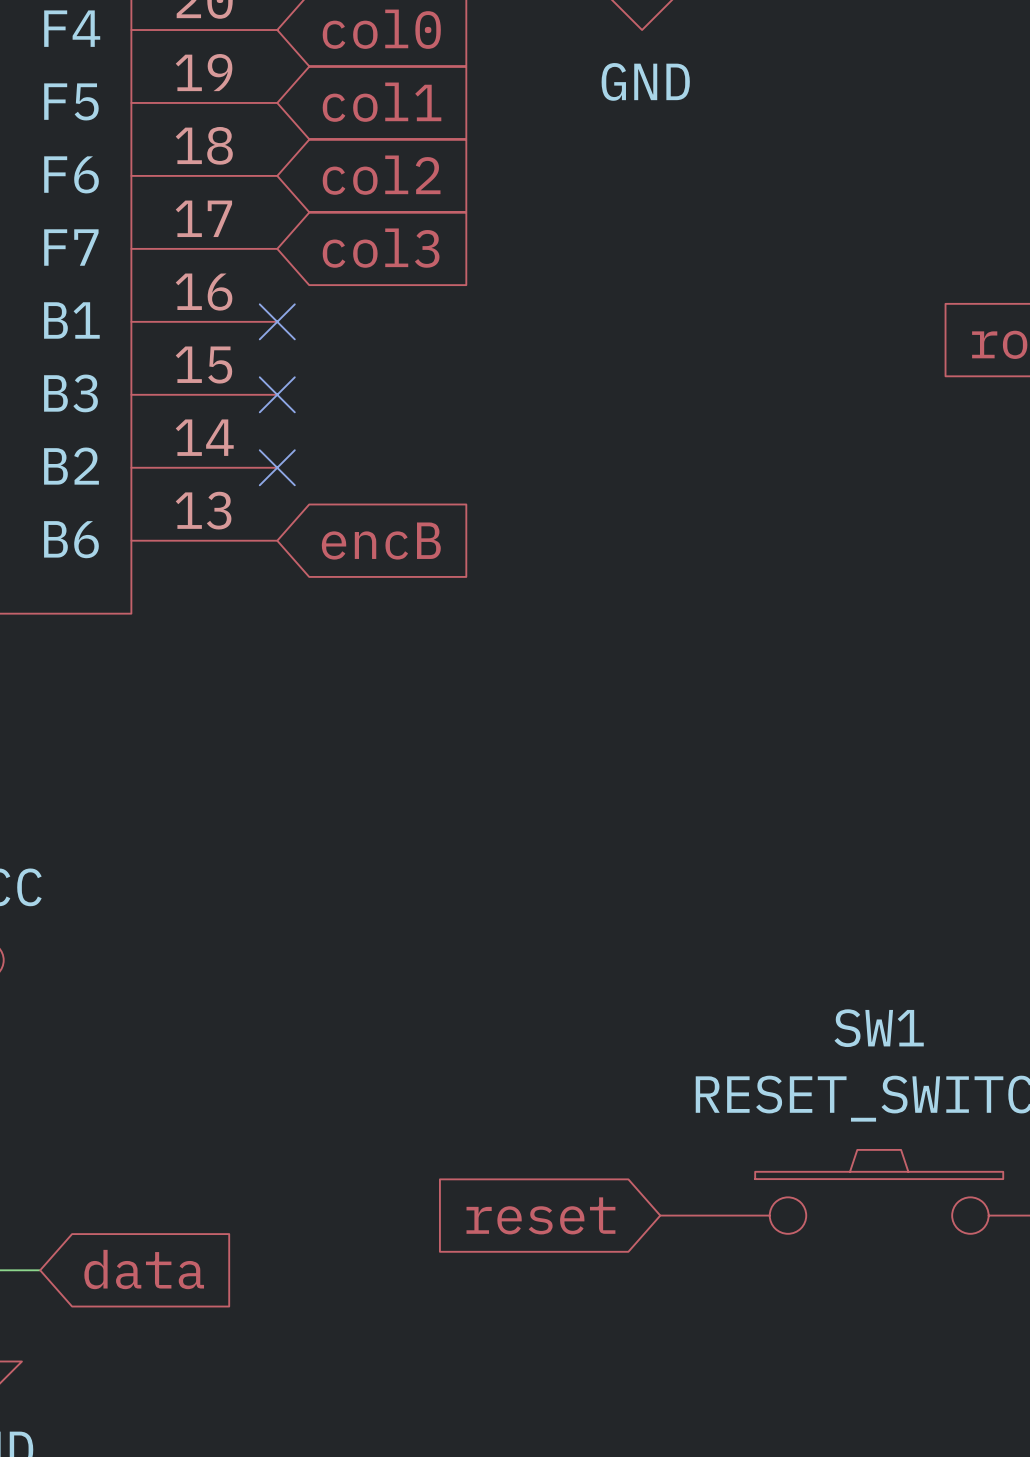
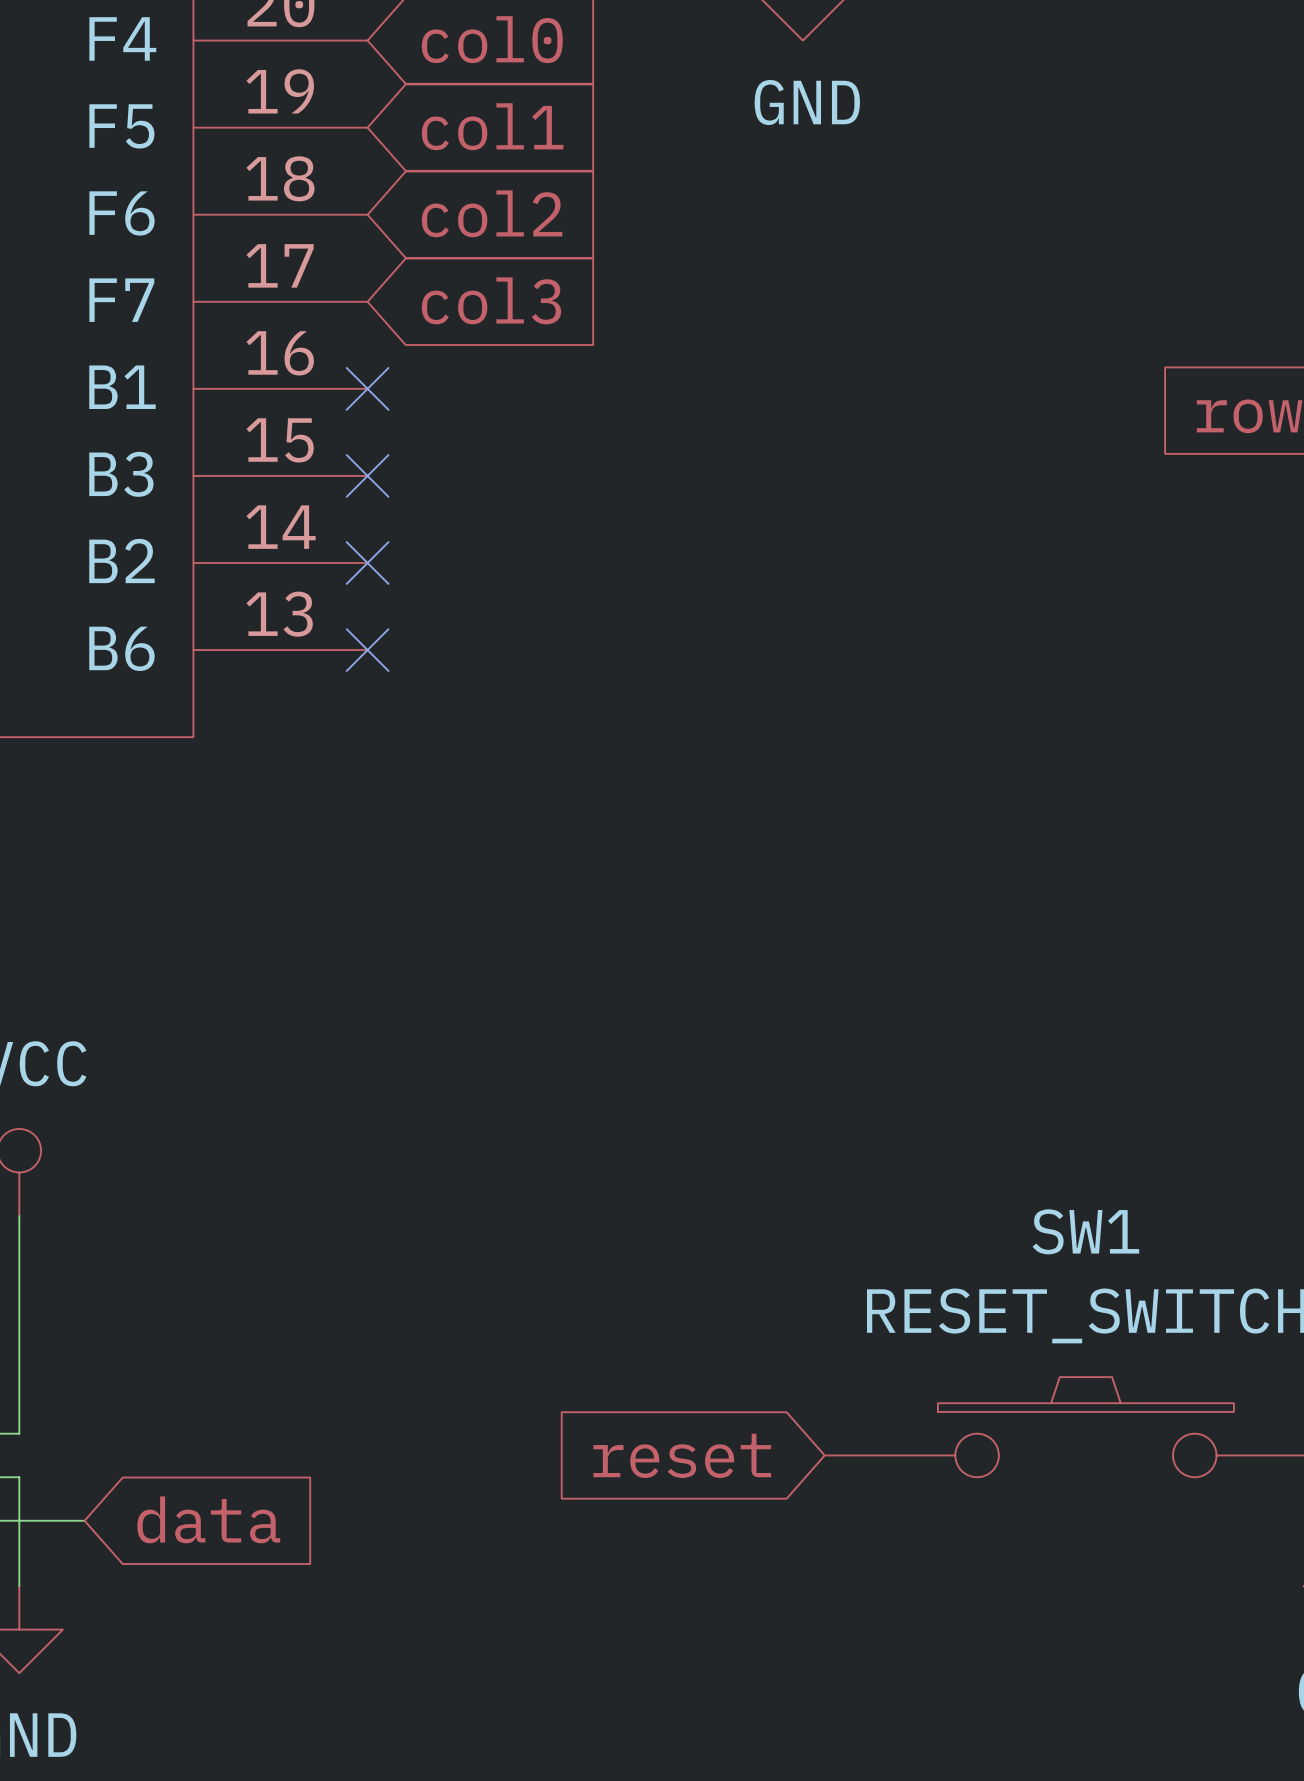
no-connect mark: none -> (367, 650)
global label: encB (381, 541) -> none

